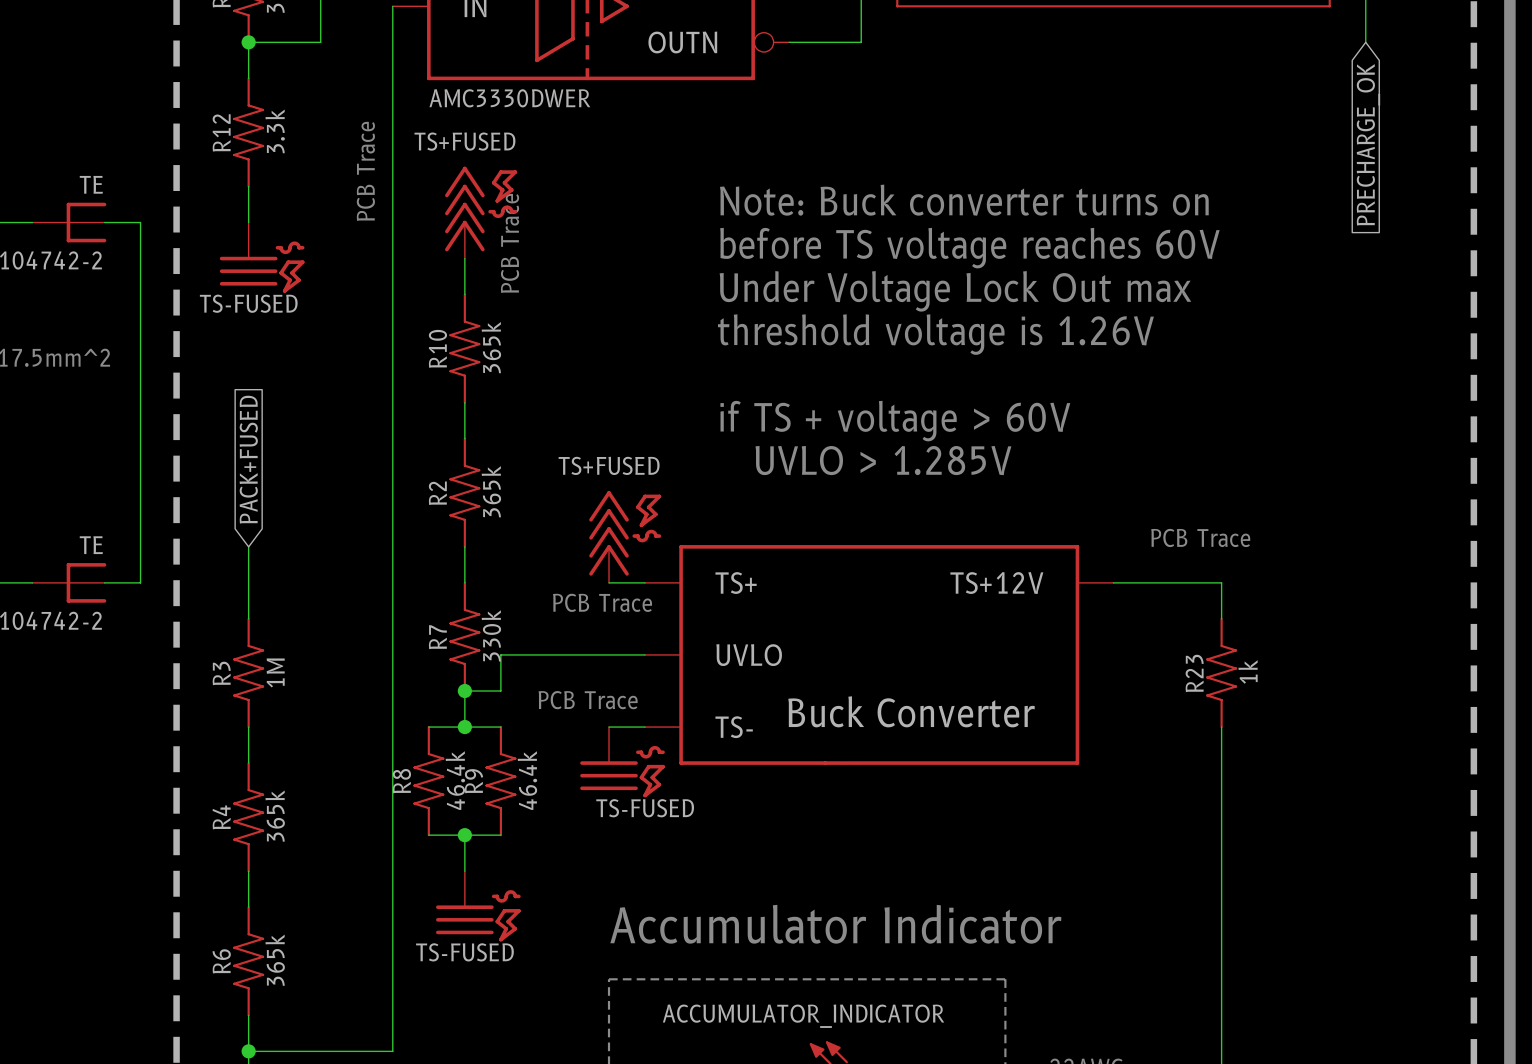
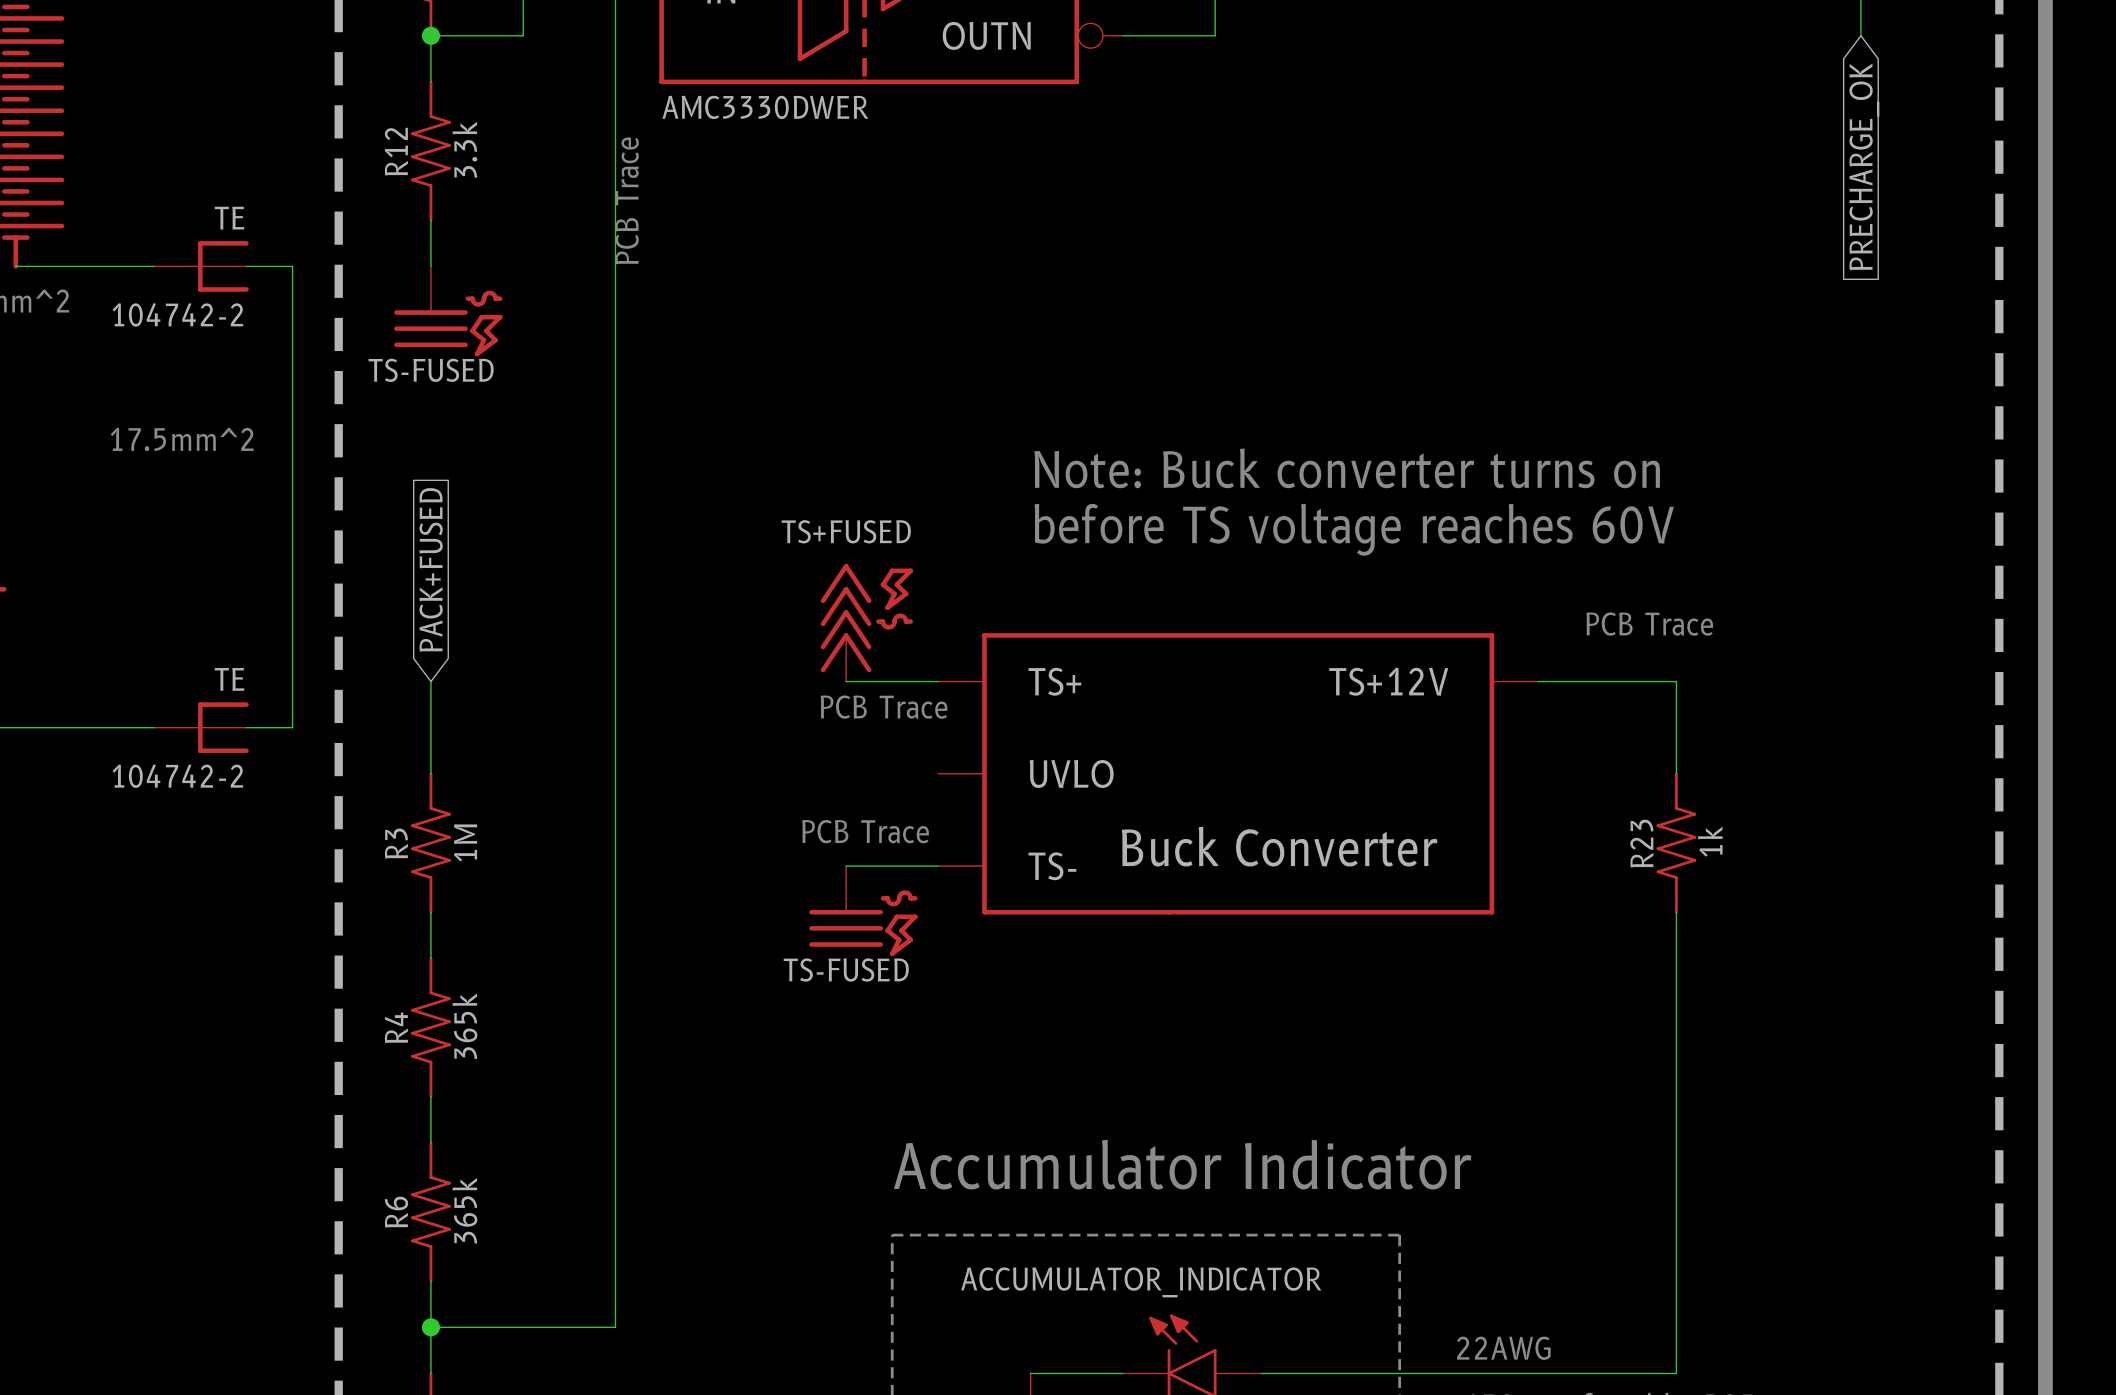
text position: PCB Trace (365, 171) -> PCB Trace (627, 200)
text position: Note: Buck converter turns on (964, 200) -> Note: Buck converter turns on (1347, 468)
power symbol: TS+FUSED (481, 212) -> none
text: PCB Trace (510, 243) -> none
text position: before TS voltage reaches 60V (969, 248) -> before TS voltage reaches 60V (1354, 529)
wire: (464, 258) (464, 294) -> none
text: Under Voltage Lock Out max (955, 291) -> none
text: threshold voltage is 1.26V (935, 334) -> none
R10: 365k (464, 348) -> none
wire: (464, 402) (464, 438) -> none
text: if TS + voltage > 60V (895, 421) -> none
text: UVLO > 1.285V (883, 460) -> none
R2: 365k (464, 492) -> none
power symbol position: TS+FUSED (625, 536) -> TS+FUSED (866, 622)
text position: PCB Trace (1200, 537) -> PCB Trace (1649, 624)
wire: (464, 546) (464, 582) -> none
wire: (609, 582) (645, 582) -> none
wire: (1113, 582) (1221, 582) -> (1538, 681) (1676, 681) (1676, 727)
text position: PCB Trace (602, 602) -> PCB Trace (883, 707)
R7: 330k (464, 636) -> none
wire: (645, 654) (500, 654) (500, 691) (464, 691) (464, 727) -> none
part position: (879, 654) -> (1238, 773)
junction: (464, 691) -> none
text position: PCB Trace (588, 700) -> PCB Trace (865, 831)
wire: (428, 727) (500, 727) -> (846, 866) (938, 866)
junction: (464, 727) -> none
wire: (609, 727) (645, 727) -> none
power symbol position: TS-FUSED (622, 762) -> TS-FUSED (863, 911)
R8: 46.4k (428, 781) -> none
R9: 46.4k (500, 781) -> none
power symbol text position: TS-FUSED (645, 808) -> TS-FUSED (846, 969)
wire: (428, 835) (500, 835) -> (846, 681) (938, 681)
wire: (464, 835) (464, 871) -> none
junction: (464, 835) -> none
power symbol: TS-FUSED (478, 906) -> none

